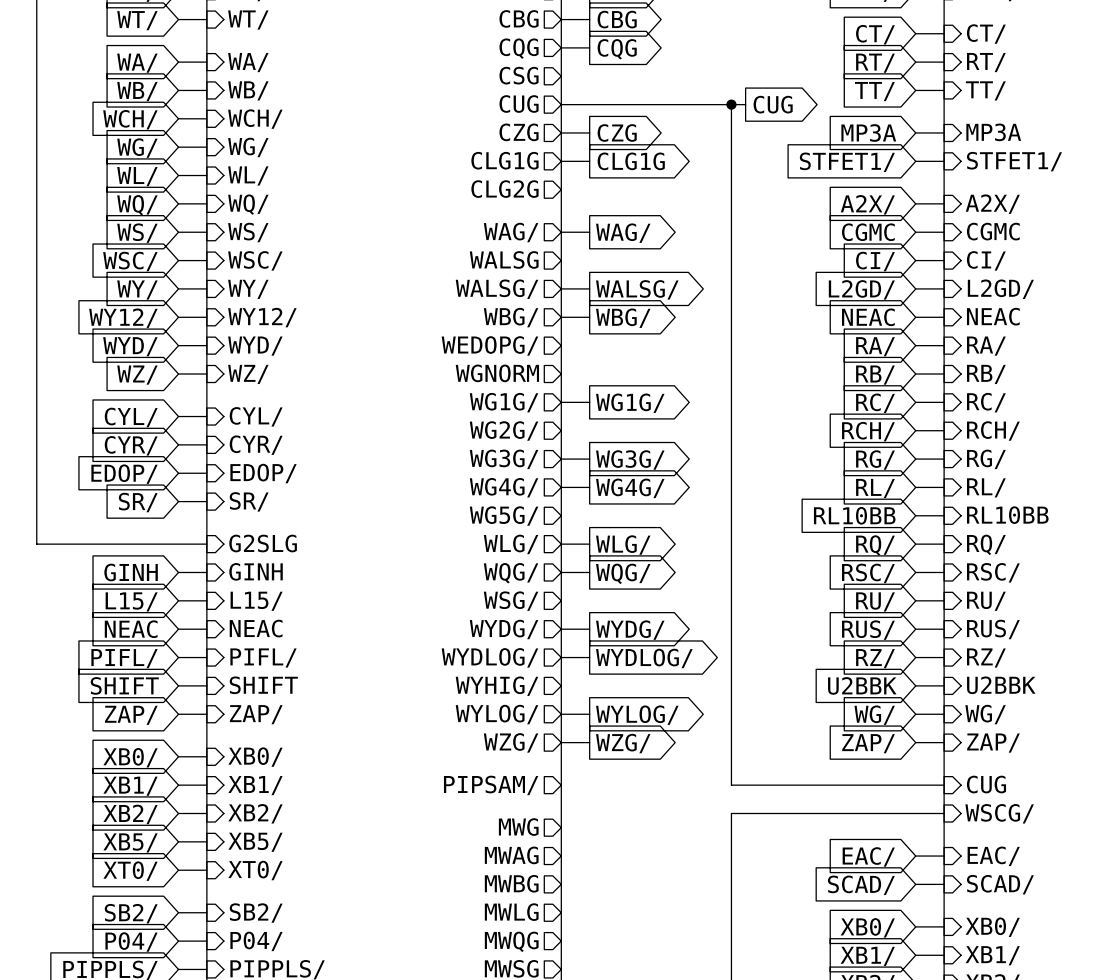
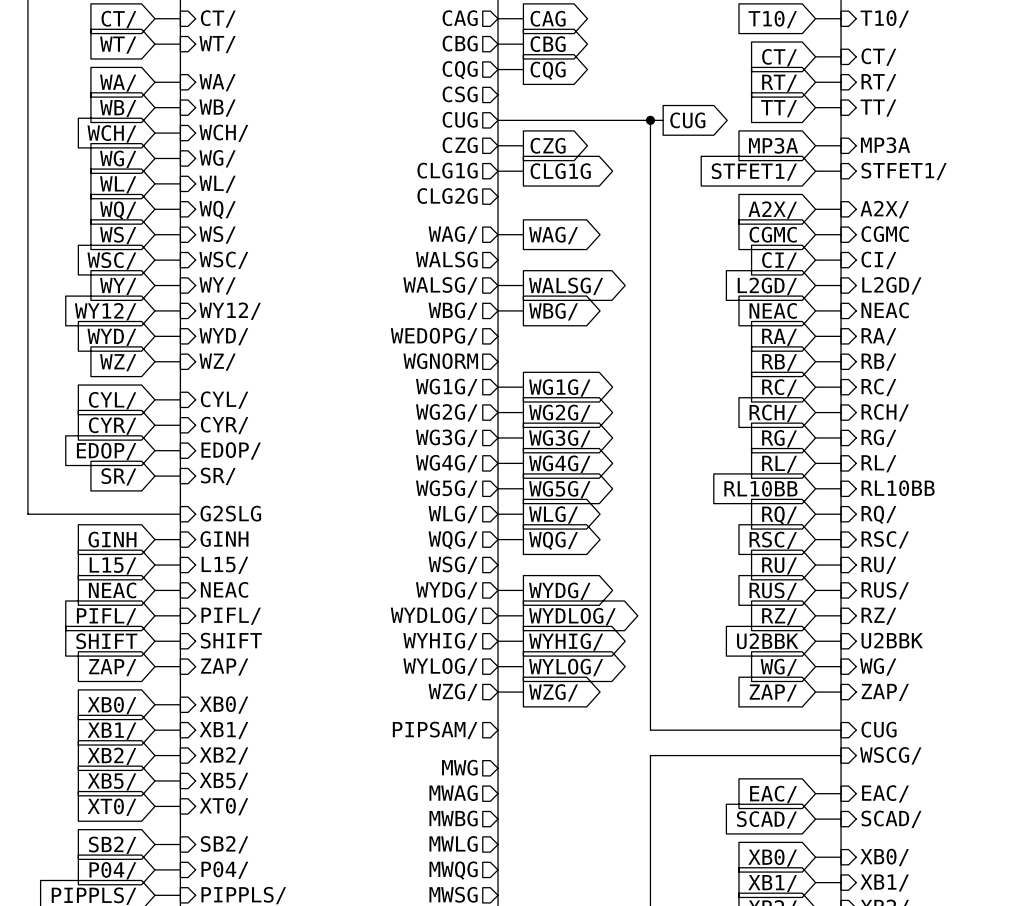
wire: none -> (498, 412) (523, 412)
global label: none -> WG2G/ (559, 413)
wire: none -> (498, 488) (523, 488)
global label: none -> WG5G/ (559, 489)
wire: none -> (498, 641) (523, 641)
global label: none -> WYHIG/ (566, 642)

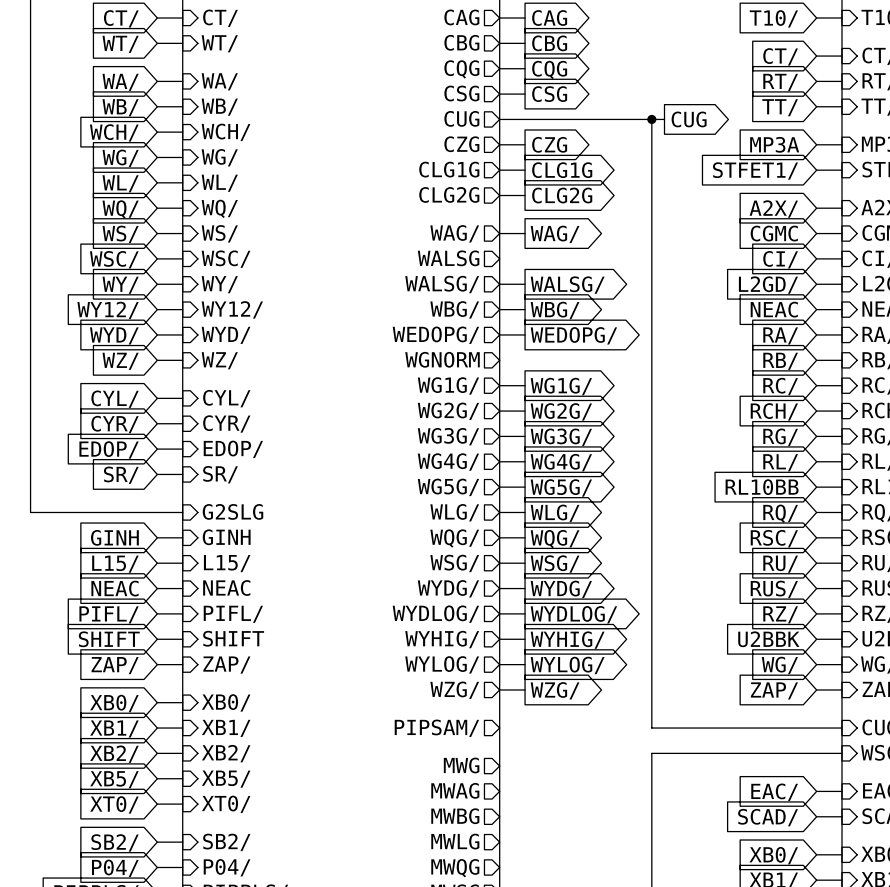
wire: none -> (499, 94) (525, 94)
global label: none -> CSG (549, 94)
wire: none -> (499, 195) (525, 195)
global label: none -> CLG2G (562, 195)
wire: none -> (499, 334) (525, 334)
global label: none -> WEDOPG/ (573, 335)
wire: none -> (499, 563) (525, 563)
global label: none -> WSG/ (555, 564)

